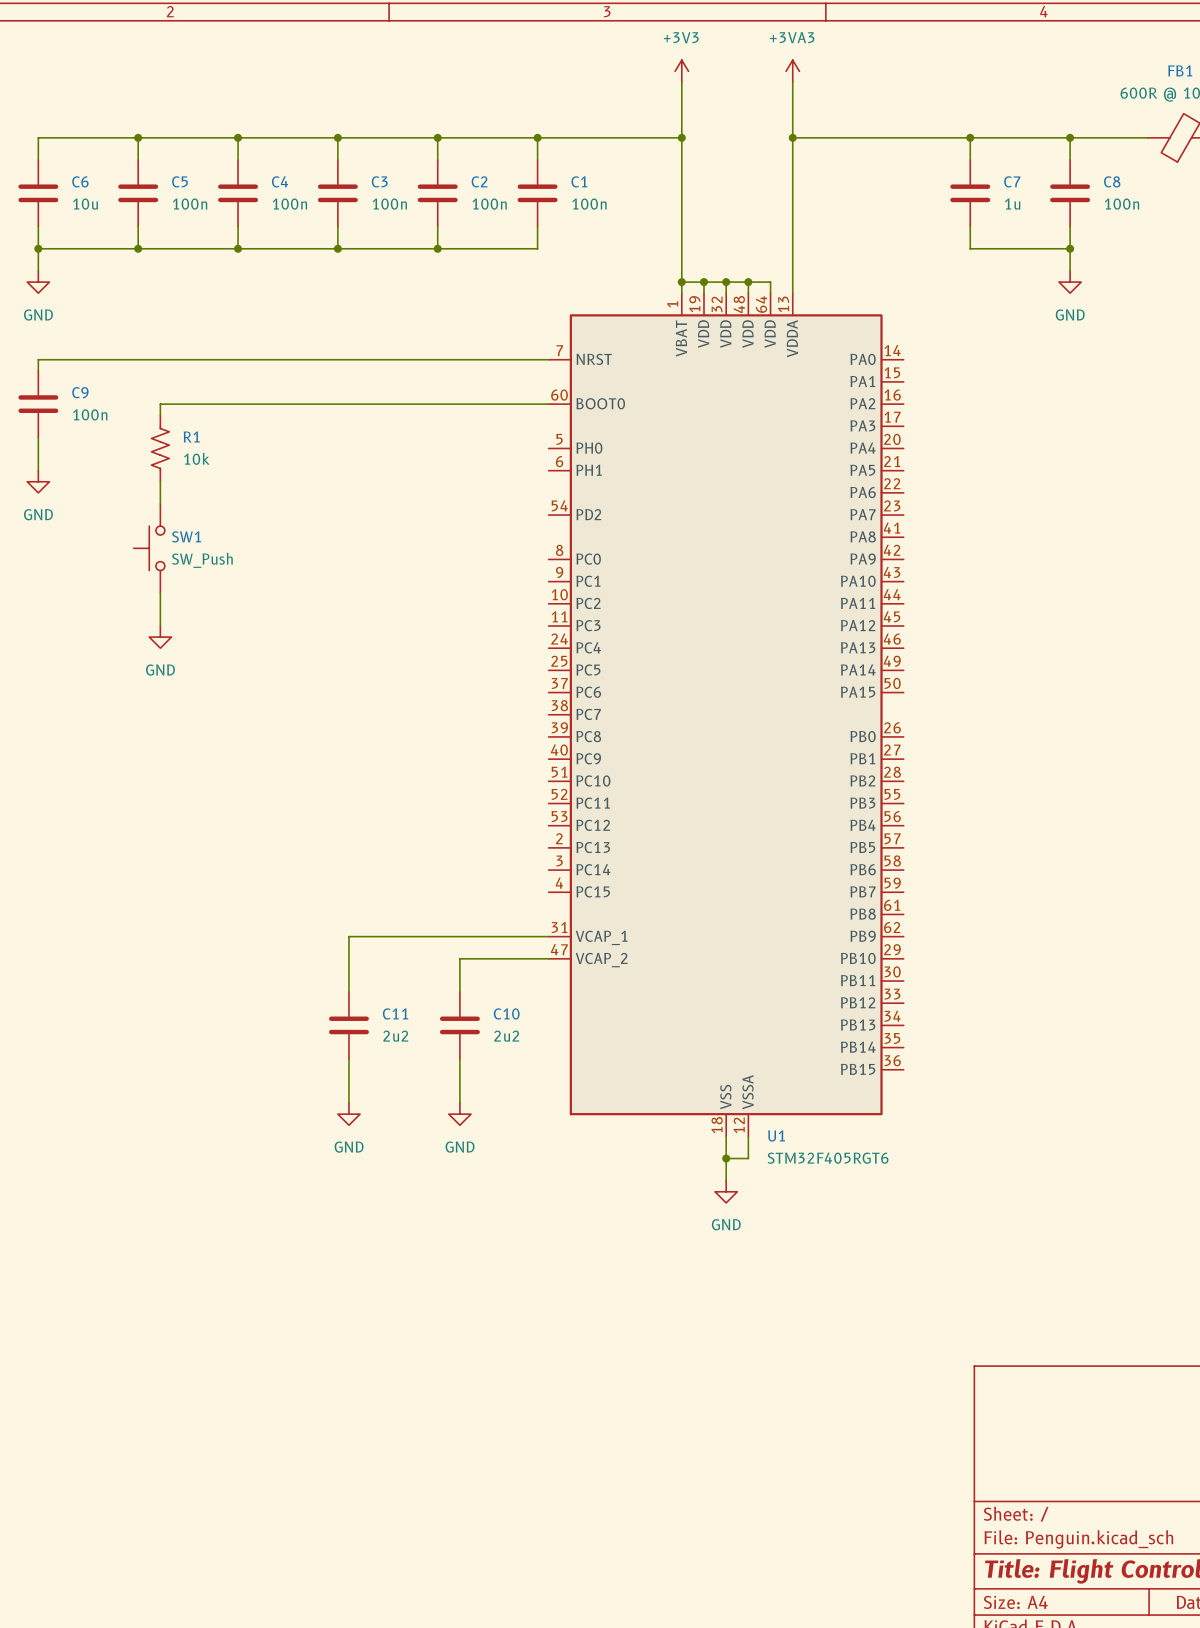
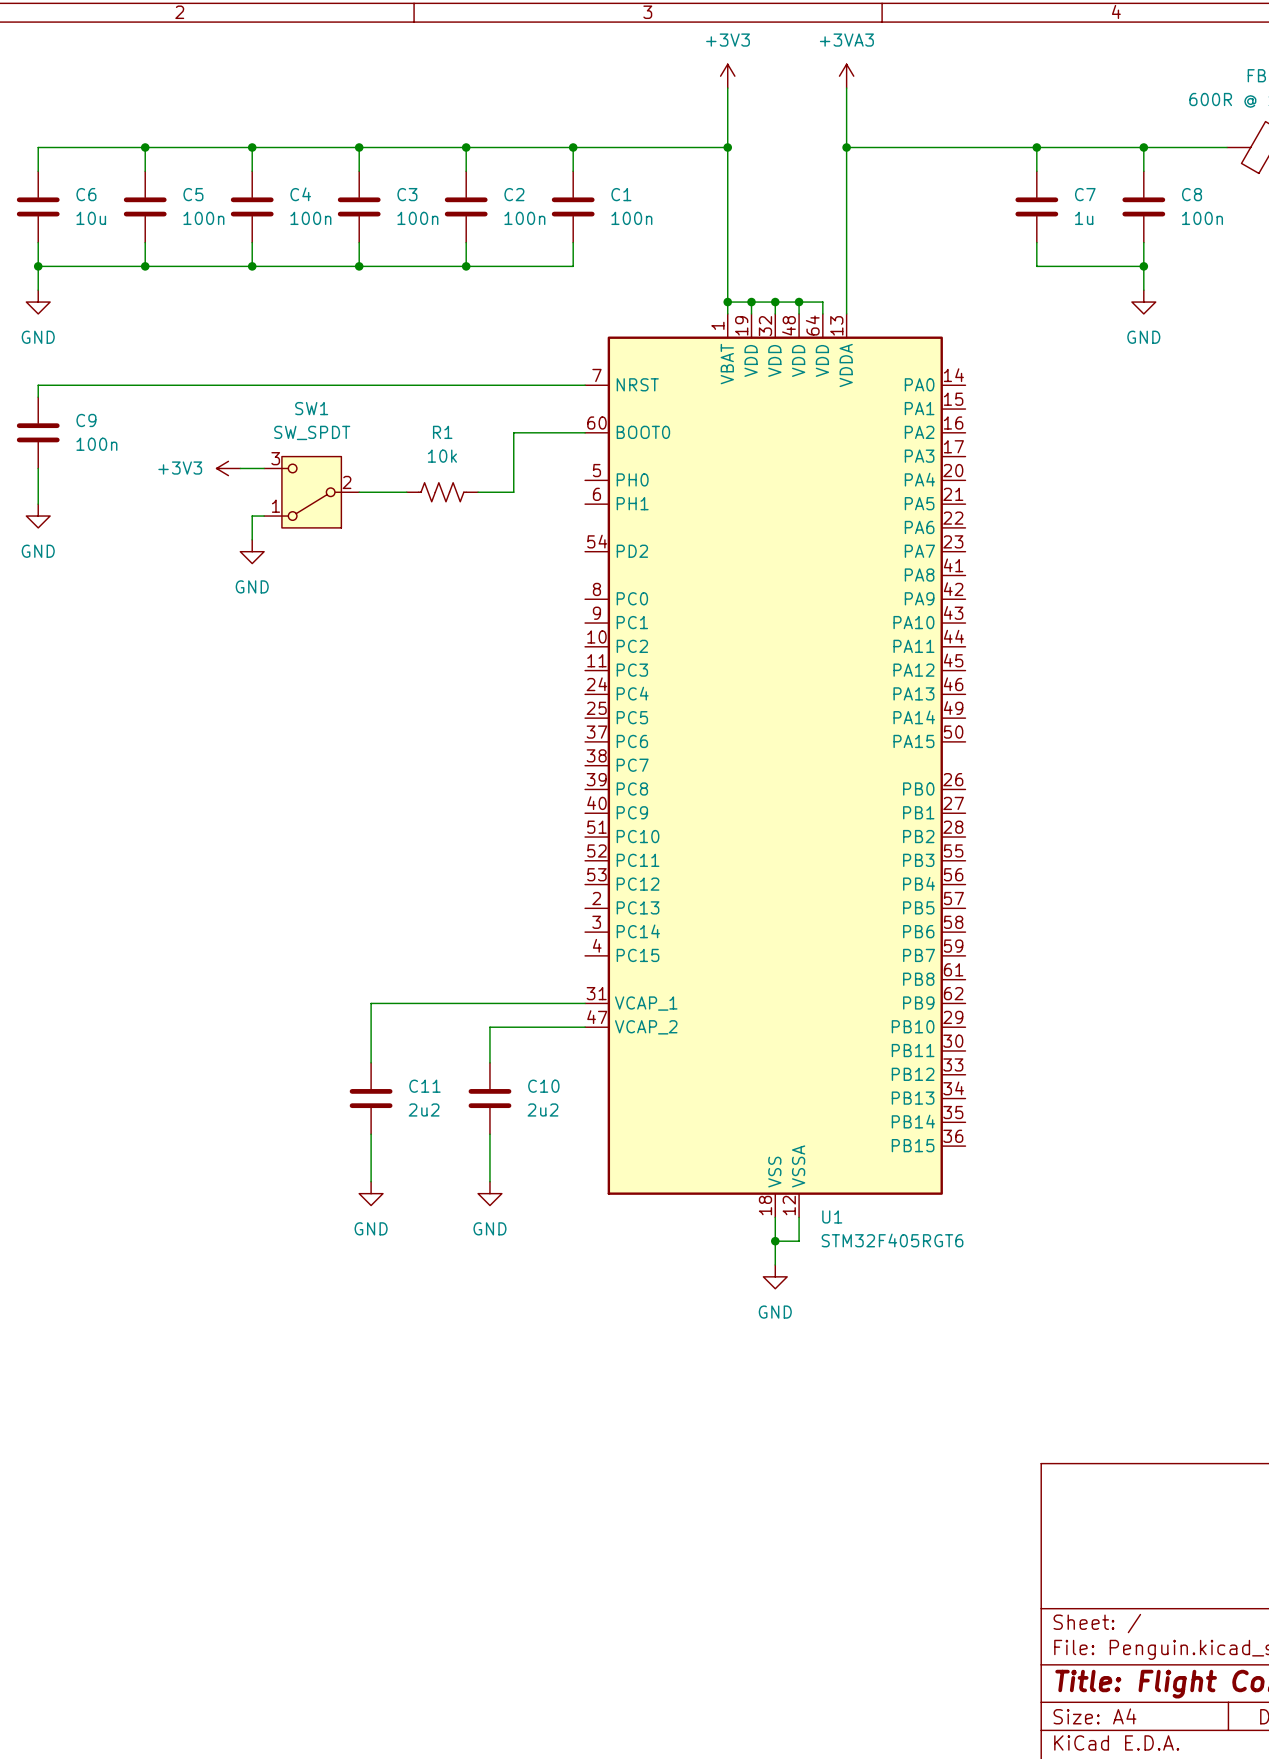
wire: (482, 404) (160, 404) (160, 415) -> (513, 432) (513, 492) (478, 492)
R1 name position: R1 (191, 436) -> R1 (442, 432)
power symbol: none -> +3V3 (228, 468)
wire: none -> (240, 468) (264, 468)
R1 rotation: 0° (160, 448) -> 90° clockwise (442, 492)
R1 position: (160, 448) -> (442, 492)
R1 value position: 10k (196, 458) -> 10k (442, 456)
wire: none -> (359, 492) (406, 492)
wire: (160, 481) (160, 503) -> none
wire: none -> (264, 516) (252, 516) (252, 539)
SW1 symbol: [133, 503, 165, 593] -> [264, 456, 360, 528]
SW1 name position: SW1 (186, 536) -> SW1 (311, 408)
SW1 value: SW_Push (202, 560) -> SW_SPDT (312, 432)
wire: (160, 592) (160, 626) -> none
power symbol position: GND (160, 637) -> GND (252, 551)

